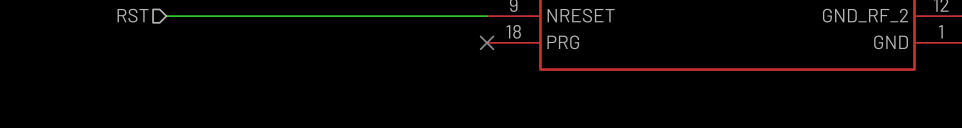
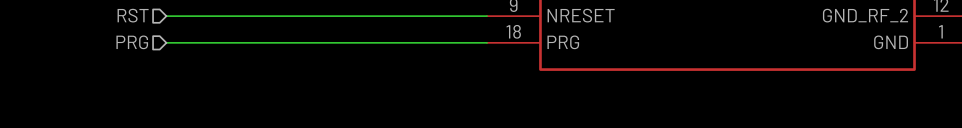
hierarchical label: none -> PRG (132, 42)
wire: none -> (166, 42) (487, 42)
no-connect mark: (487, 42) -> none

